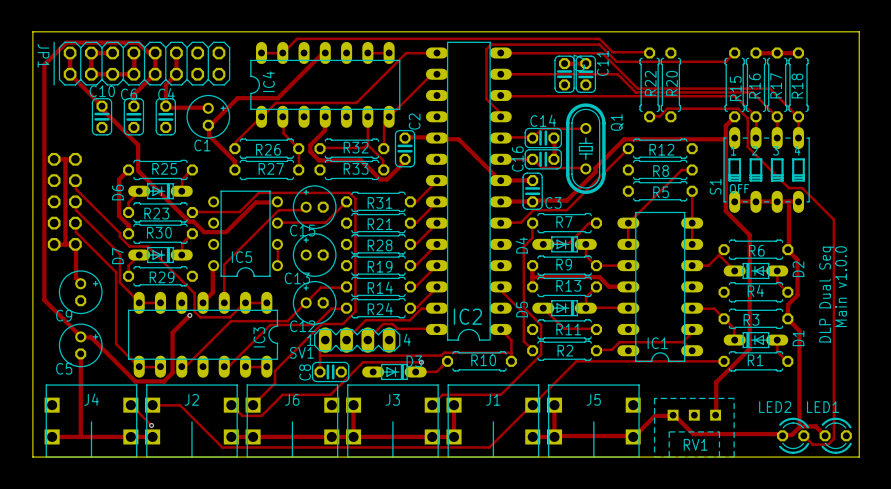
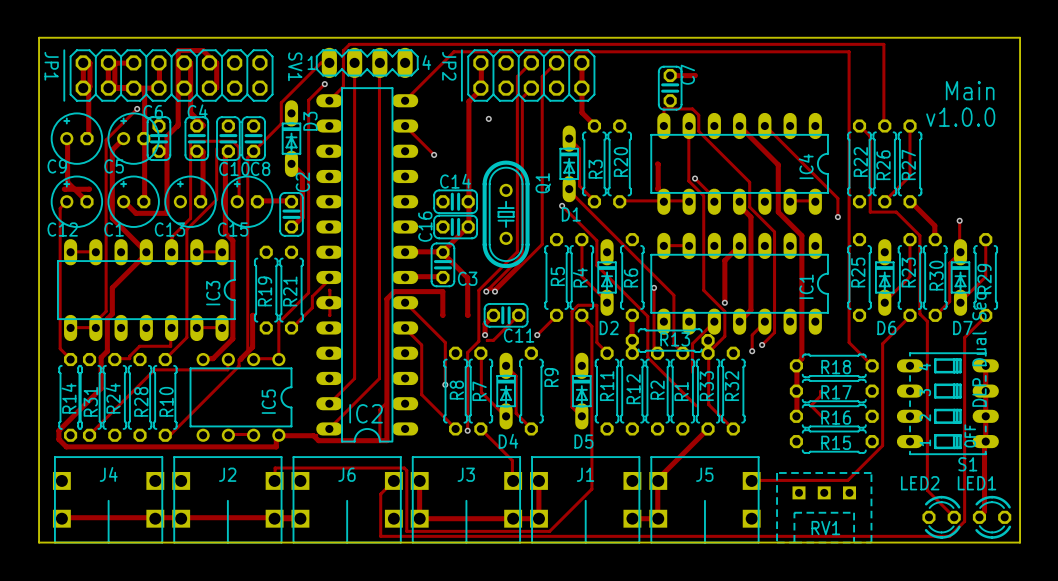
track: none -> (89, 62) (88, 136) (87, 138)
track: (176, 52) (176, 74) (165, 84) (165, 106) (166, 107) (208, 108) -> none
track: (261, 52) (282, 53) (297, 38) (599, 38) (612, 52) (649, 52) -> none
track: none -> (329, 62) (321, 62) (281, 102) (281, 123) (247, 157) (247, 351) (239, 359) (239, 366) (170, 434) (165, 435)
track: none -> (354, 62) (354, 378) (329, 403)
track: none -> (379, 62) (379, 378) (329, 428)
track: (325, 52) (322, 53) (277, 98) (237, 98) (208, 125) (208, 135) (234, 161) (234, 169) -> none
track: (367, 52) (389, 52) -> none
track: none -> (480, 62) (481, 87) (468, 101) (468, 226) (442, 252)
track: (436, 52) (406, 53) (356, 102) (275, 102) (235, 142) (234, 148) -> none
track: none -> (531, 62) (517, 76) (517, 251) (478, 290) (478, 341) (467, 352) (467, 430)
track: none -> (556, 62) (542, 76) (542, 244) (495, 291)
track: (500, 52) (602, 53) (637, 88) (769, 88) (798, 116) (798, 138) -> none
track: (734, 52) (725, 61) (616, 61) (599, 44) (491, 44) (486, 49) (486, 99) (499, 112) (500, 116) -> none
track: (755, 52) (798, 52) -> none
track: none -> (114, 62) (114, 88) (139, 87) (144, 90) (143, 201)
track: none -> (190, 62) (190, 112) (203, 126)
track: none -> (581, 62) (581, 112) (594, 126)
JP2: none -> (528, 75)
track: none -> (324, 84) (308, 100) (308, 292) (278, 322) (278, 359) (253, 359)
via: none -> (324, 84)
track: (70, 74) (138, 145) (138, 170) (188, 221) (193, 221) (204, 232) (226, 232) (255, 202) (277, 201) -> none
track: none -> (215, 88) (216, 62) (203, 50) (178, 50) (178, 123) (167, 136) (167, 213) (135, 213) (123, 201)
track: (436, 74) (431, 74) (384, 122) (383, 148) -> none
track: none -> (531, 88) (522, 97) (522, 255) (486, 291)
track: (500, 74) (617, 74) (635, 92) (752, 92) (777, 116) (777, 138) -> none
C11 rotation: 0° (585, 74) -> 90° clockwise (506, 315)
C11 position: (585, 74) -> (506, 315)
text: none -> Main (970, 90)
track: none -> (329, 100) (343, 86) (343, 50) (349, 44) (883, 44) (884, 126)
IC4 rotation: 0° (325, 84) -> 180° (739, 163)
IC4 position: (325, 84) -> (739, 163)
track: none -> (405, 100) (454, 51) (849, 51) (849, 342) (872, 365)
R22 position: (649, 84) -> (859, 163)
R20 position: (670, 84) -> (619, 163)
R15 rotation: 0° (734, 84) -> 90° clockwise (834, 441)
R15 position: (734, 84) -> (834, 441)
R16 rotation: 0° (755, 84) -> 90° clockwise (834, 416)
R16 position: (755, 84) -> (834, 416)
R17 rotation: 0° (777, 84) -> 90° clockwise (834, 391)
R17 position: (777, 84) -> (834, 391)
R18 rotation: 0° (798, 84) -> 90° clockwise (834, 365)
R18 position: (798, 84) -> (834, 365)
track: none -> (137, 108) (106, 140) (106, 311) (94, 322) (95, 327) (70, 327)
via: none -> (137, 108)
track: (500, 95) (735, 96) (756, 117) (755, 138) -> none
text: none -> v1.0.0 (960, 117)
via: none -> (488, 118)
track: (133, 106) (134, 94) (155, 72) (155, 53) (147, 52) (138, 42) (66, 42) (44, 64) (44, 300) (80, 337) (91, 337) (135, 381) (163, 381) (172, 372) (172, 332) (189, 315) -> none
track: none -> (405, 126) (434, 154)
track: none -> (663, 126) (663, 108) (692, 108) (698, 115) (698, 131) (749, 182) (749, 207) (774, 231) (774, 332) (762, 345)
track: none -> (689, 126) (688, 181) (703, 195) (703, 290) (724, 311) (724, 336) (708, 353) (708, 404) (733, 428)
track: none -> (739, 126) (778, 164) (778, 212) (801, 235) (801, 358) (796, 365) (796, 416)
track: none -> (764, 126) (837, 198) (837, 217)
track: none -> (910, 126) (909, 176) (884, 201)
track: none -> (66, 138) (67, 182) (87, 201)
C10 rotation: 0° (102, 116) -> 180° (228, 138)
C10 position: (102, 116) -> (228, 138)
track: none -> (123, 138) (112, 149) (112, 218) (146, 252) (112, 287) (112, 313) (107, 318) (107, 351) (101, 357) (101, 388) (58, 430) (58, 439) (66, 446) (276, 446) (276, 435) (278, 435) (313, 435) (318, 440) (386, 440) (386, 299) (394, 291) (442, 291) (442, 315)
C1 rotation: 0° (208, 116) -> 90° counterclockwise (133, 201)
C1 position: (208, 116) -> (133, 201)
track: (282, 116) (283, 133) (298, 148) (298, 169) -> none
track: (325, 116) (324, 130) (310, 145) (310, 151) (319, 160) (361, 160) (380, 179) (386, 179) (405, 159) -> none
track: (367, 116) (367, 145) -> none
track: none -> (569, 138) (579, 148) (579, 185) (594, 201)
track: (649, 116) (659, 116) (667, 108) (738, 108) (747, 118) (747, 146) (788, 188) (802, 188) (833, 219) (833, 438) (828, 444) (812, 444) (803, 435) -> (859, 126) (870, 136) (870, 212) (896, 212) (919, 235) (919, 313) (927, 321) (927, 490) (954, 517)
track: (734, 116) (725, 125) (725, 211) (749, 235) (749, 348) (716, 382) (715, 415) -> none
track: none -> (216, 148) (216, 199) (186, 229) (186, 337) (165, 359)
track: none -> (203, 151) (203, 199) (200, 201)
track: none -> (228, 151) (225, 154) (225, 233) (232, 240) (232, 338) (212, 358) (203, 359)
track: (585, 128) (542, 128) (532, 138) (500, 138) -> none
via: none -> (434, 154)
track: none -> (291, 163) (302, 174) (302, 217) (291, 226)
track: (405, 138) (458, 139) (500, 180) -> none
C14 position: (543, 138) -> (455, 201)
track: (725, 139) (624, 139) (566, 200) (500, 201) -> none
track: (367, 145) (383, 160) (383, 169) -> none
track: (367, 145) (364, 147) (319, 148) -> none
R26 rotation: 0° (266, 148) -> 90° clockwise (884, 163)
R26 position: (266, 148) -> (884, 163)
R32 rotation: 0° (351, 148) -> 90° clockwise (733, 391)
R32 position: (351, 148) -> (733, 391)
C2 position: (405, 148) -> (291, 214)
Q1 position: (585, 148) -> (506, 214)
track: (628, 148) (566, 210) (533, 210) (520, 222) (500, 223) -> none
R12 rotation: 0° (660, 148) -> 90° clockwise (632, 391)
R12 position: (660, 148) -> (632, 391)
track: none -> (695, 178) (713, 197) (714, 201)
via: none -> (695, 178)
track: (65, 159) (65, 244) -> none
track: none -> (569, 189) (673, 295) (673, 343) (682, 353)
track: (500, 159) (533, 159) (542, 168) (585, 168) -> none
C16 position: (543, 159) -> (455, 226)
track: none -> (66, 201) (60, 208) (60, 348) (70, 359)
track: (128, 169) (119, 179) (119, 215) (128, 225) (128, 233) -> none
R25 rotation: 0° (160, 169) -> 90° clockwise (859, 277)
R25 position: (160, 169) -> (859, 277)
track: (192, 169) (182, 179) (181, 191) -> none
track: none -> (237, 201) (239, 199) (239, 147) (232, 141) (190, 141) (190, 218) (171, 236) (171, 252)
track: none -> (257, 201) (291, 201)
R27 rotation: 0° (266, 169) -> 90° clockwise (910, 163)
R27 position: (266, 169) -> (910, 163)
R33 rotation: 0° (351, 169) -> 90° clockwise (708, 391)
R33 position: (351, 169) -> (708, 391)
track: none -> (619, 201) (689, 201)
track: none -> (739, 201) (739, 205) (750, 217) (750, 310) (739, 321)
R8 rotation: 0° (660, 169) -> 90° clockwise (455, 391)
R8 position: (660, 169) -> (455, 391)
track: none -> (790, 201) (815, 201)
track: (692, 169) (681, 169) (628, 223) (628, 244) -> none
track: none -> (910, 201) (934, 225) (935, 239)
S1 rotation: 0° (766, 169) -> 90° counterclockwise (947, 403)
S1 position: (766, 169) -> (947, 403)
track: none -> (562, 205) (596, 240) (596, 265) (647, 316) (647, 357) (696, 405)
via: none -> (562, 205)
track: (75, 180) (75, 189) (119, 233) (119, 236) (129, 246) (147, 246) (194, 293) (194, 311) (200, 317) (230, 317) (244, 302) (266, 302) -> none
track: (436, 180) (416, 201) (410, 201) -> none
track: (500, 180) (532, 180) -> none
via: none -> (837, 217)
track: none -> (959, 220) (960, 252) (949, 263) (949, 301) (935, 315)
via: none -> (959, 220)
track: (139, 191) (128, 202) (128, 212) -> none
D6 rotation: 0° (160, 191) -> 90° counterclockwise (884, 277)
D6 position: (160, 191) -> (884, 277)
IC2 position: (468, 191) -> (367, 264)
C3 position: (532, 191) -> (442, 264)
R5 rotation: 0° (660, 191) -> 90° clockwise (556, 277)
R5 position: (660, 191) -> (556, 277)
track: (692, 191) (692, 244) -> none
part: (64, 201) -> none
track: (75, 201) (75, 210) (119, 254) (119, 282) (139, 302) (160, 302) -> none
track: (346, 201) (325, 222) (277, 223) -> none
R31 rotation: 0° (378, 201) -> 90° clockwise (89, 397)
R31 position: (378, 201) -> (89, 397)
track: (436, 201) (416, 222) (410, 223) -> none
track: none -> (581, 239) (581, 276) (607, 302)
track: (734, 201) (798, 201) -> none
track: none -> (910, 239) (909, 276) (884, 302)
track: (788, 201) (787, 249) (797, 259) (797, 295) (787, 304) (787, 318) (799, 330) (800, 426) -> none
track: none -> (985, 239) (985, 276) (960, 302)
track: (306, 207) (302, 210) (278, 210) (224, 264) (224, 302) -> none
C15 position: (314, 207) -> (247, 201)
track: none -> (663, 245) (689, 245)
track: none -> (739, 245) (724, 260) (724, 302)
track: none -> (70, 252) (95, 252)
R23 rotation: 0° (160, 212) -> 90° clockwise (910, 277)
R23 position: (160, 212) -> (910, 277)
track: none -> (196, 252) (222, 252)
track: (192, 212) (239, 212) (258, 192) (349, 192) (355, 198) (355, 311) (342, 324) (321, 324) (275, 370) (275, 383) (253, 405) -> none
track: none -> (405, 252) (442, 252)
track: none -> (442, 252) (467, 277) (468, 315)
track: (75, 223) (75, 232) (116, 272) (116, 344) (138, 366) (160, 366) -> none
R21 rotation: 0° (378, 223) -> 90° clockwise (291, 290)
R21 position: (378, 223) -> (291, 290)
track: (532, 223) (532, 237) (523, 246) (523, 307) (541, 324) (541, 354) (500, 394) (442, 394) (432, 405) -> (480, 428) (512, 460) (513, 480)
R7 rotation: 0° (564, 223) -> 90° clockwise (480, 391)
R7 position: (564, 223) -> (480, 391)
track: (596, 223) (588, 223) (568, 243) (543, 244) -> none
R30 rotation: 0° (160, 233) -> 90° clockwise (935, 277)
R30 position: (160, 233) -> (935, 277)
track: (192, 233) (182, 243) (181, 255) -> none
IC5 rotation: 0° (245, 233) -> 90° counterclockwise (241, 397)
IC5 position: (245, 233) -> (241, 397)
track: none -> (329, 277) (312, 296) (312, 307) (291, 327)
track: none -> (405, 277) (442, 277)
track: none -> (654, 287) (654, 349) (657, 353)
via: none -> (654, 287)
track: (54, 244) (75, 244) (75, 278) (80, 283) -> none
R28 rotation: 0° (378, 244) -> 90° clockwise (140, 397)
R28 position: (378, 244) -> (140, 397)
track: (436, 244) (415, 265) (410, 265) -> none
D4 rotation: 0° (564, 244) -> 90° counterclockwise (506, 391)
D4 position: (564, 244) -> (506, 391)
track: (585, 244) (586, 256) (595, 265) (628, 265) -> none
via: none -> (486, 291)
via: none -> (495, 291)
track: (724, 249) (708, 265) (692, 265) -> none
R6 rotation: 0° (755, 249) -> 90° clockwise (632, 277)
R6 position: (755, 249) -> (632, 277)
track: (139, 255) (128, 265) (128, 276) -> none
D7 rotation: 0° (160, 255) -> 90° counterclockwise (960, 277)
D7 position: (160, 255) -> (960, 277)
C13 position: (314, 255) -> (190, 201)
track: none -> (405, 302) (445, 342) (445, 384)
via: none -> (724, 302)
track: (719, 255) (734, 270) -> none
R9 name position: R9 (564, 264) -> R9 (551, 377)
R19 rotation: 0° (378, 265) -> 90° clockwise (266, 290)
R19 position: (378, 265) -> (266, 290)
track: none -> (493, 315) (485, 323) (485, 335)
track: none -> (556, 315) (537, 335)
R9 rotation: 0° (564, 265) -> 90° clockwise (531, 391)
R9 position: (564, 265) -> (531, 391)
track: none -> (910, 315) (882, 343) (882, 445) (847, 480) (751, 480)
track: none -> (985, 315) (964, 337) (964, 521) (949, 536) (380, 536) (380, 494) (393, 480)
track: none -> (714, 321) (692, 343) (692, 372)
track: none -> (764, 321) (752, 335) (752, 351)
D2 rotation: 0° (755, 270) -> 90° clockwise (607, 277)
D2 position: (755, 270) -> (607, 277)
track: (777, 270) (777, 281) (787, 292) -> none
track: none -> (171, 327) (170, 346) (139, 346) (129, 356) (129, 358) (114, 359)
R29 rotation: 0° (160, 276) -> 90° clockwise (985, 277)
R29 position: (160, 276) -> (985, 277)
track: none -> (196, 327) (222, 327)
track: none -> (405, 327) (421, 345) (421, 394) (455, 428)
track: (532, 277) (599, 277) (609, 286) (628, 286) -> none
via: none -> (485, 335)
via: none -> (537, 335)
track: (346, 286) (320, 287) (287, 321) (230, 321) (186, 366) (181, 366) -> none
R14 rotation: 0° (378, 286) -> 90° clockwise (70, 397)
R14 position: (378, 286) -> (70, 397)
track: (436, 286) (416, 307) (410, 308) -> none
track: (500, 286) (500, 290) (523, 313) (523, 341) (532, 350) -> none
track: (596, 286) (586, 297) (585, 308) (628, 308) -> none
IC1 rotation: 0° (660, 286) -> 90° counterclockwise (739, 283)
text: Main v1.0.0 (841, 286) -> none
via: none -> (762, 345)
C9 rotation: 0° (80, 292) -> 90° counterclockwise (76, 138)
C9 position: (80, 292) -> (76, 138)
R4 rotation: 0° (755, 292) -> 90° clockwise (581, 277)
R4 position: (755, 292) -> (581, 277)
via: none -> (752, 351)
track: none -> (480, 353) (481, 392) (506, 416)
track: none -> (607, 353) (596, 342) (596, 305) (578, 305) (572, 311) (572, 407) (581, 416)
track: none -> (228, 359) (227, 369) (154, 369) (89, 435)
C12 position: (314, 302) -> (76, 201)
track: (346, 308) (331, 308) (315, 324) (270, 324) (229, 366) (224, 366) -> none
R24 rotation: 0° (378, 308) -> 90° clockwise (114, 397)
R24 position: (378, 308) -> (114, 397)
track: (436, 308) (421, 308) (409, 320) (365, 320) (346, 340) -> none
track: (543, 308) (564, 328) (596, 329) -> none
D5 rotation: 0° (564, 308) -> 90° counterclockwise (581, 391)
D5 position: (564, 308) -> (581, 391)
track: (692, 308) (714, 308) (734, 328) (734, 340) -> none
via: (189, 315) -> none
R3 rotation: 0° (755, 318) -> 90° clockwise (594, 163)
R3 position: (755, 318) -> (594, 163)
via: none -> (445, 384)
track: (436, 329) (397, 328) (392, 324) (383, 324) (367, 340) -> none
track: (500, 329) (511, 340) (511, 361) -> none
R11 rotation: 0° (564, 329) -> 90° clockwise (607, 391)
R11 position: (564, 329) -> (607, 391)
IC3 position: (203, 334) -> (146, 290)
SV1 position: (357, 340) -> (367, 62)
D1 rotation: 0° (755, 340) -> 90° clockwise (569, 163)
D1 position: (755, 340) -> (569, 163)
track: (777, 340) (777, 351) (787, 361) -> none
track: (683, 342) (619, 342) (611, 349) (596, 350) -> none
C5 rotation: 0° (80, 345) -> 90° counterclockwise (133, 138)
C5 position: (80, 345) -> (133, 138)
R2 rotation: 0° (564, 350) -> 90° clockwise (657, 391)
SV1 name rotation: 0° (302, 352) -> 90° clockwise (295, 66)
track: (511, 352) (444, 352) (441, 355) (319, 355) -> none
track: (80, 353) (80, 436) -> none
track: (447, 361) (436, 371) (415, 371) -> (531, 428) (516, 413) (516, 376) (506, 365)
R10 rotation: 0° (479, 361) -> 90° clockwise (165, 397)
R10 position: (479, 361) -> (165, 397)
track: none -> (708, 428) (659, 477) (658, 518)
track: (724, 361) (576, 361) (489, 447) (222, 447) (180, 405) (152, 405) -> none
R1 rotation: 0° (755, 361) -> 90° clockwise (682, 391)
R1 position: (755, 361) -> (682, 391)
track: (421, 362) (363, 362) (330, 394) (282, 394) (261, 415) (242, 415) (231, 405) -> (581, 315) (591, 326) (591, 489) (549, 531) (406, 531) (406, 470) (404, 468) (275, 468) (274, 480)
via position: (421, 362) -> (467, 430)
track: none -> (228, 435) (253, 435)
C8 rotation: 0° (330, 371) -> 90° counterclockwise (253, 138)
C8 position: (330, 371) -> (253, 138)
D3 rotation: 0° (394, 371) -> 90° counterclockwise (291, 138)
D3 position: (394, 371) -> (291, 138)
track: (130, 405) (151, 425) -> none
track: (554, 405) (554, 436) (633, 436) (654, 415) (675, 415) (693, 434) (781, 434) (782, 435) (791, 435) (800, 426) -> none
via: (151, 425) -> none
track: (800, 426) (815, 426) (825, 435) -> (985, 365) (984, 511) (979, 517)
track: (52, 436) (152, 436) -> (61, 518) (300, 518)
track: (253, 436) (353, 436) -> none

